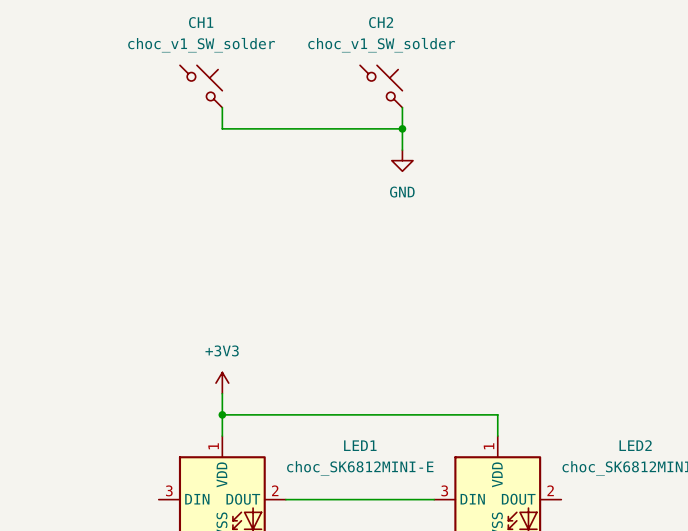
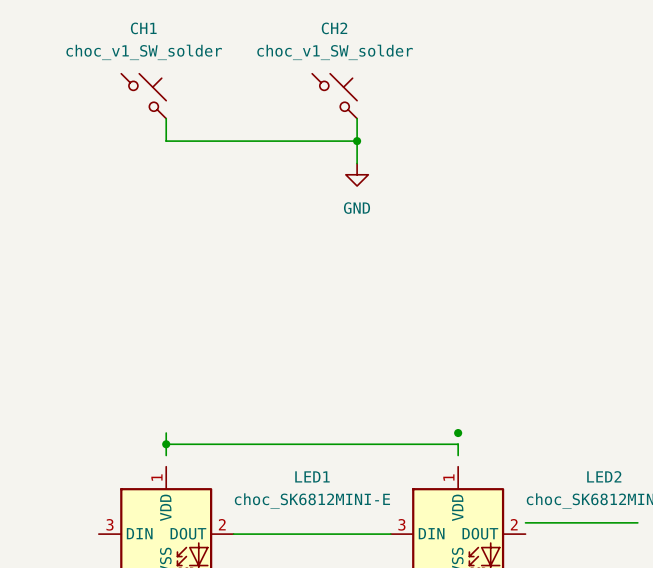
power symbol: +3V3 (222, 383) -> none
wire: (222, 393) (222, 404) -> none
junction: none -> (458, 433)
wire: (222, 425) (222, 436) -> none
wire: (497, 425) (497, 436) -> none
wire: none -> (525, 522) (637, 522)

